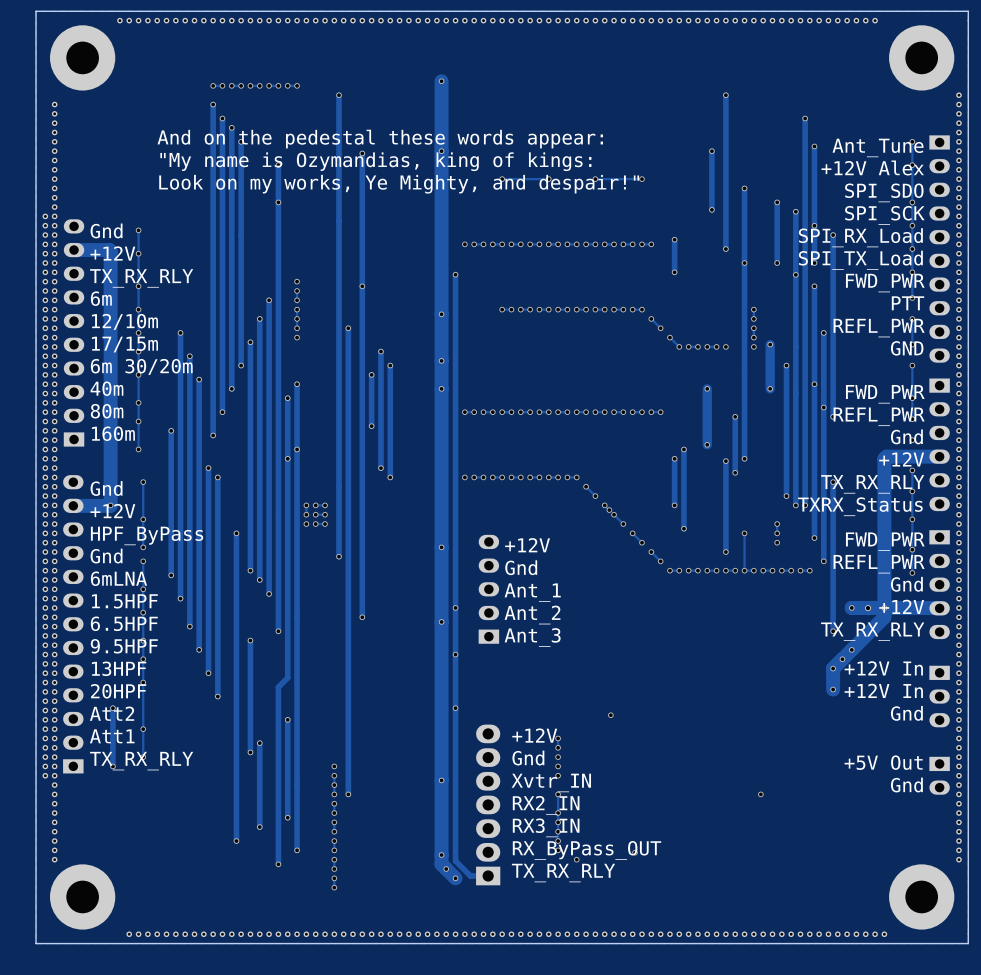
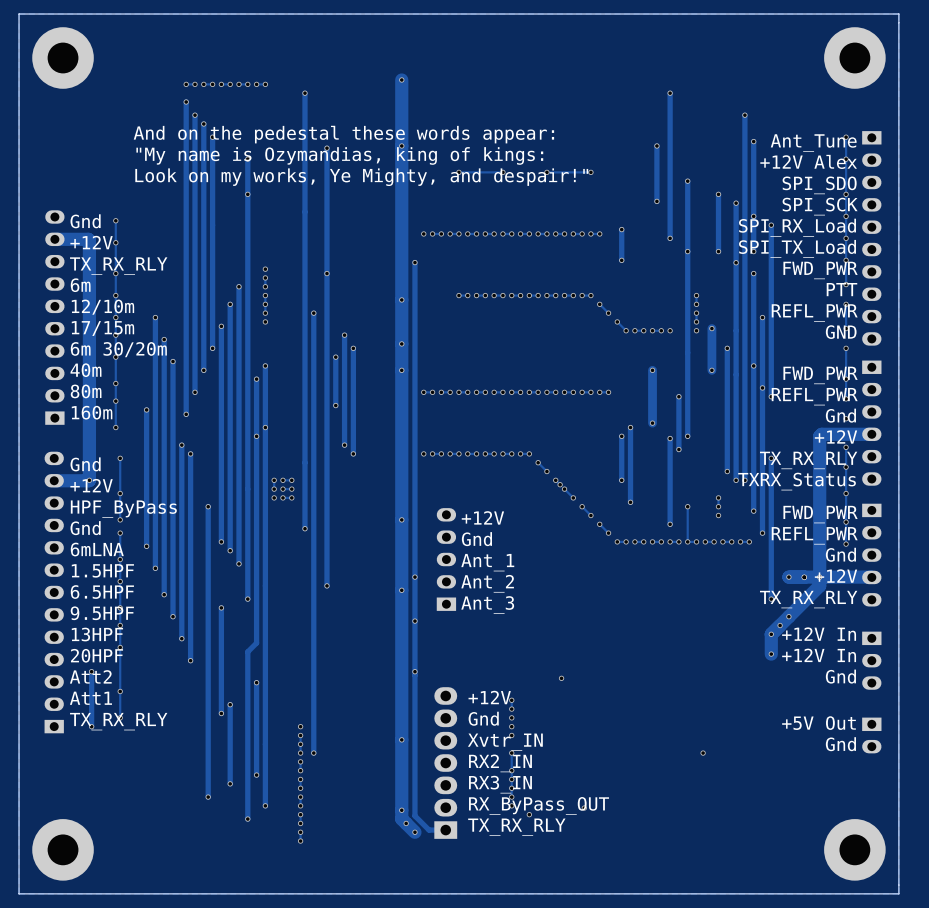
part: (119, 20) -> none
part: (129, 20) -> none
part: (138, 20) -> none
part: (147, 20) -> none
part: (157, 20) -> none
part: (166, 20) -> none
part: (175, 20) -> none
part: (185, 20) -> none
part: (194, 20) -> none
part: (203, 20) -> none
part: (213, 20) -> none
part: (222, 20) -> none
part: (231, 20) -> none
part: (241, 20) -> none
part: (250, 20) -> none
part: (259, 20) -> none
part: (269, 20) -> none
part: (278, 20) -> none
part: (287, 20) -> none
part: (297, 20) -> none
part: (306, 20) -> none
part: (315, 20) -> none
part: (325, 20) -> none
part: (334, 20) -> none
part: (343, 20) -> none
part: (353, 20) -> none
part: (362, 20) -> none
part: (371, 20) -> none
part: (380, 20) -> none
part: (390, 20) -> none
part: (399, 20) -> none
part: (408, 20) -> none
part: (418, 20) -> none
part: (427, 20) -> none
part: (436, 20) -> none
part: (446, 20) -> none
part: (455, 20) -> none
part: (464, 20) -> none
part: (474, 20) -> none
part: (483, 20) -> none
part: (492, 20) -> none
part: (502, 20) -> none
part: (511, 20) -> none
part: (520, 20) -> none
part: (530, 20) -> none
part: (539, 20) -> none
part: (548, 20) -> none
part: (558, 20) -> none
part: (567, 20) -> none
part: (576, 20) -> none
part: (586, 20) -> none
part: (595, 20) -> none
part: (604, 20) -> none
part: (614, 20) -> none
part: (623, 20) -> none
part: (632, 20) -> none
part: (642, 20) -> none
part: (651, 20) -> none
part: (660, 20) -> none
part: (669, 20) -> none
part: (679, 20) -> none
part: (688, 20) -> none
part: (697, 20) -> none
part: (707, 20) -> none
part: (716, 20) -> none
part: (725, 20) -> none
part: (735, 20) -> none
part: (744, 20) -> none
part: (753, 20) -> none
part: (763, 20) -> none
part: (772, 20) -> none
part: (781, 20) -> none
part: (791, 20) -> none
part: (800, 20) -> none
part: (809, 20) -> none
part: (819, 20) -> none
part: (828, 20) -> none
part: (837, 20) -> none
part: (847, 20) -> none
part: (856, 20) -> none
part: (865, 20) -> none
part: (875, 20) -> none
part: (958, 95) -> none
part: (54, 104) -> none
part: (958, 104) -> none
part: (54, 113) -> none
part: (958, 113) -> none
part: (54, 123) -> none
part: (958, 123) -> none
part: (54, 132) -> none
part: (958, 132) -> none
part: (54, 141) -> none
part: (958, 141) -> none
part: (54, 151) -> none
part: (958, 151) -> none
part: (54, 160) -> none
part: (958, 160) -> none
part: (54, 169) -> none
part: (958, 169) -> none
part: (54, 179) -> none
part: (958, 179) -> none
part: (54, 188) -> none
part: (958, 188) -> none
part: (54, 197) -> none
part: (958, 197) -> none
part: (54, 207) -> none
part: (958, 207) -> none
part: (45, 216) -> none
part: (54, 216) -> none
part: (958, 216) -> none
part: (45, 225) -> none
part: (54, 225) -> none
part: (958, 225) -> none
part: (45, 235) -> none
part: (54, 235) -> none
part: (958, 235) -> none
part: (45, 244) -> none
part: (54, 244) -> none
part: (958, 244) -> none
part: (45, 253) -> none
part: (54, 253) -> none
part: (958, 253) -> none
part: (45, 263) -> none
part: (54, 263) -> none
part: (958, 263) -> none
part: (45, 272) -> none
part: (54, 272) -> none
part: (958, 272) -> none
part: (45, 281) -> none
part: (54, 281) -> none
part: (958, 281) -> none
part: (45, 290) -> none
part: (54, 290) -> none
part: (958, 290) -> none
part: (45, 300) -> none
part: (54, 300) -> none
part: (958, 300) -> none
part: (45, 309) -> none
part: (54, 309) -> none
part: (958, 309) -> none
part: (45, 318) -> none
part: (54, 318) -> none
part: (958, 318) -> none
part: (45, 328) -> none
part: (54, 328) -> none
part: (958, 328) -> none
part: (45, 337) -> none
part: (54, 337) -> none
part: (958, 337) -> none
part: (45, 346) -> none
part: (54, 346) -> none
part: (958, 346) -> none
part: (45, 356) -> none
part: (54, 356) -> none
part: (958, 356) -> none
part: (45, 365) -> none
part: (54, 365) -> none
part: (958, 365) -> none
part: (45, 374) -> none
part: (54, 374) -> none
part: (958, 374) -> none
part: (45, 384) -> none
part: (54, 384) -> none
part: (958, 384) -> none
part: (45, 393) -> none
part: (54, 393) -> none
part: (958, 393) -> none
part: (45, 402) -> none
part: (54, 402) -> none
part: (958, 402) -> none
part: (45, 412) -> none
part: (54, 412) -> none
part: (958, 412) -> none
part: (45, 421) -> none
part: (54, 421) -> none
part: (958, 421) -> none
part: (45, 430) -> none
part: (54, 430) -> none
part: (958, 430) -> none
part: (45, 440) -> none
part: (54, 440) -> none
part: (958, 440) -> none
part: (45, 449) -> none
part: (54, 449) -> none
part: (958, 449) -> none
part: (45, 458) -> none
part: (54, 458) -> none
part: (958, 458) -> none
part: (45, 468) -> none
part: (54, 468) -> none
part: (958, 468) -> none
part: (45, 477) -> none
part: (54, 477) -> none
part: (958, 477) -> none
part: (45, 486) -> none
part: (54, 486) -> none
part: (958, 486) -> none
part: (45, 496) -> none
part: (54, 496) -> none
part: (958, 496) -> none
part: (45, 505) -> none
part: (54, 505) -> none
part: (958, 505) -> none
part: (45, 514) -> none
part: (54, 514) -> none
part: (958, 514) -> none
part: (45, 524) -> none
part: (54, 524) -> none
part: (958, 524) -> none
part: (45, 533) -> none
part: (54, 533) -> none
part: (958, 533) -> none
part: (45, 542) -> none
part: (54, 542) -> none
part: (958, 542) -> none
part: (45, 552) -> none
part: (54, 552) -> none
part: (958, 552) -> none
part: (45, 561) -> none
part: (54, 561) -> none
part: (958, 561) -> none
part: (45, 570) -> none
part: (54, 570) -> none
part: (958, 570) -> none
part: (45, 579) -> none
part: (54, 579) -> none
part: (958, 579) -> none
part: (45, 589) -> none
part: (54, 589) -> none
part: (958, 589) -> none
part: (45, 598) -> none
part: (54, 598) -> none
part: (958, 598) -> none
part: (45, 607) -> none
part: (54, 607) -> none
part: (958, 607) -> none
part: (45, 617) -> none
part: (54, 617) -> none
part: (958, 617) -> none
part: (45, 626) -> none
part: (54, 626) -> none
part: (958, 626) -> none
part: (45, 635) -> none
part: (54, 635) -> none
part: (958, 635) -> none
part: (45, 645) -> none
part: (54, 645) -> none
part: (958, 645) -> none
part: (45, 654) -> none
part: (54, 654) -> none
part: (958, 654) -> none
part: (45, 663) -> none
part: (54, 663) -> none
part: (958, 663) -> none
part: (45, 673) -> none
part: (54, 673) -> none
part: (958, 673) -> none
part: (45, 682) -> none
part: (54, 682) -> none
part: (958, 682) -> none
part: (45, 691) -> none
part: (54, 691) -> none
part: (958, 691) -> none
part: (45, 701) -> none
part: (54, 701) -> none
part: (958, 701) -> none
part: (45, 710) -> none
part: (54, 710) -> none
part: (958, 710) -> none
part: (45, 719) -> none
part: (54, 719) -> none
part: (958, 719) -> none
part: (45, 729) -> none
part: (54, 729) -> none
part: (958, 729) -> none
part: (45, 738) -> none
part: (54, 738) -> none
part: (958, 738) -> none
part: (45, 747) -> none
part: (54, 747) -> none
part: (958, 747) -> none
part: (45, 757) -> none
part: (54, 757) -> none
part: (958, 757) -> none
part: (45, 766) -> none
part: (54, 766) -> none
part: (958, 766) -> none
part: (45, 775) -> none
part: (54, 775) -> none
part: (958, 775) -> none
part: (54, 785) -> none
part: (958, 785) -> none
part: (54, 794) -> none
part: (958, 794) -> none
part: (54, 803) -> none
part: (958, 803) -> none
part: (54, 813) -> none
part: (958, 813) -> none
part: (54, 822) -> none
part: (958, 822) -> none
part: (54, 831) -> none
part: (958, 831) -> none
part: (54, 841) -> none
part: (958, 841) -> none
part: (54, 850) -> none
part: (958, 850) -> none
part: (54, 859) -> none
part: (958, 859) -> none
part: (129, 934) -> none
part: (138, 934) -> none
part: (147, 934) -> none
part: (157, 934) -> none
part: (166, 934) -> none
part: (175, 934) -> none
part: (185, 934) -> none
part: (194, 934) -> none
part: (203, 934) -> none
part: (213, 934) -> none
part: (222, 934) -> none
part: (231, 934) -> none
part: (241, 934) -> none
part: (250, 934) -> none
part: (259, 934) -> none
part: (269, 934) -> none
part: (278, 934) -> none
part: (287, 934) -> none
part: (297, 934) -> none
part: (306, 934) -> none
part: (315, 934) -> none
part: (325, 934) -> none
part: (334, 934) -> none
part: (343, 934) -> none
part: (353, 934) -> none
part: (362, 934) -> none
part: (371, 934) -> none
part: (380, 934) -> none
part: (390, 934) -> none
part: (399, 934) -> none
part: (408, 934) -> none
part: (418, 934) -> none
part: (427, 934) -> none
part: (436, 934) -> none
part: (446, 934) -> none
part: (455, 934) -> none
part: (464, 934) -> none
part: (474, 934) -> none
part: (483, 934) -> none
part: (492, 934) -> none
part: (502, 934) -> none
part: (511, 934) -> none
part: (520, 934) -> none
part: (530, 934) -> none
part: (539, 934) -> none
part: (548, 934) -> none
part: (558, 934) -> none
part: (567, 934) -> none
part: (576, 934) -> none
part: (586, 934) -> none
part: (595, 934) -> none
part: (604, 934) -> none
part: (614, 934) -> none
part: (623, 934) -> none
part: (632, 934) -> none
part: (642, 934) -> none
part: (651, 934) -> none
part: (660, 934) -> none
part: (669, 934) -> none
part: (679, 934) -> none
part: (688, 934) -> none
part: (697, 934) -> none
part: (707, 934) -> none
part: (716, 934) -> none
part: (725, 934) -> none
part: (735, 934) -> none
part: (744, 934) -> none
part: (753, 934) -> none
part: (763, 934) -> none
part: (772, 934) -> none
part: (781, 934) -> none
part: (791, 934) -> none
part: (800, 934) -> none
part: (809, 934) -> none
part: (819, 934) -> none
part: (828, 934) -> none
part: (837, 934) -> none
part: (847, 934) -> none
part: (856, 934) -> none
part: (865, 934) -> none
part: (875, 934) -> none
part: (884, 934) -> none

